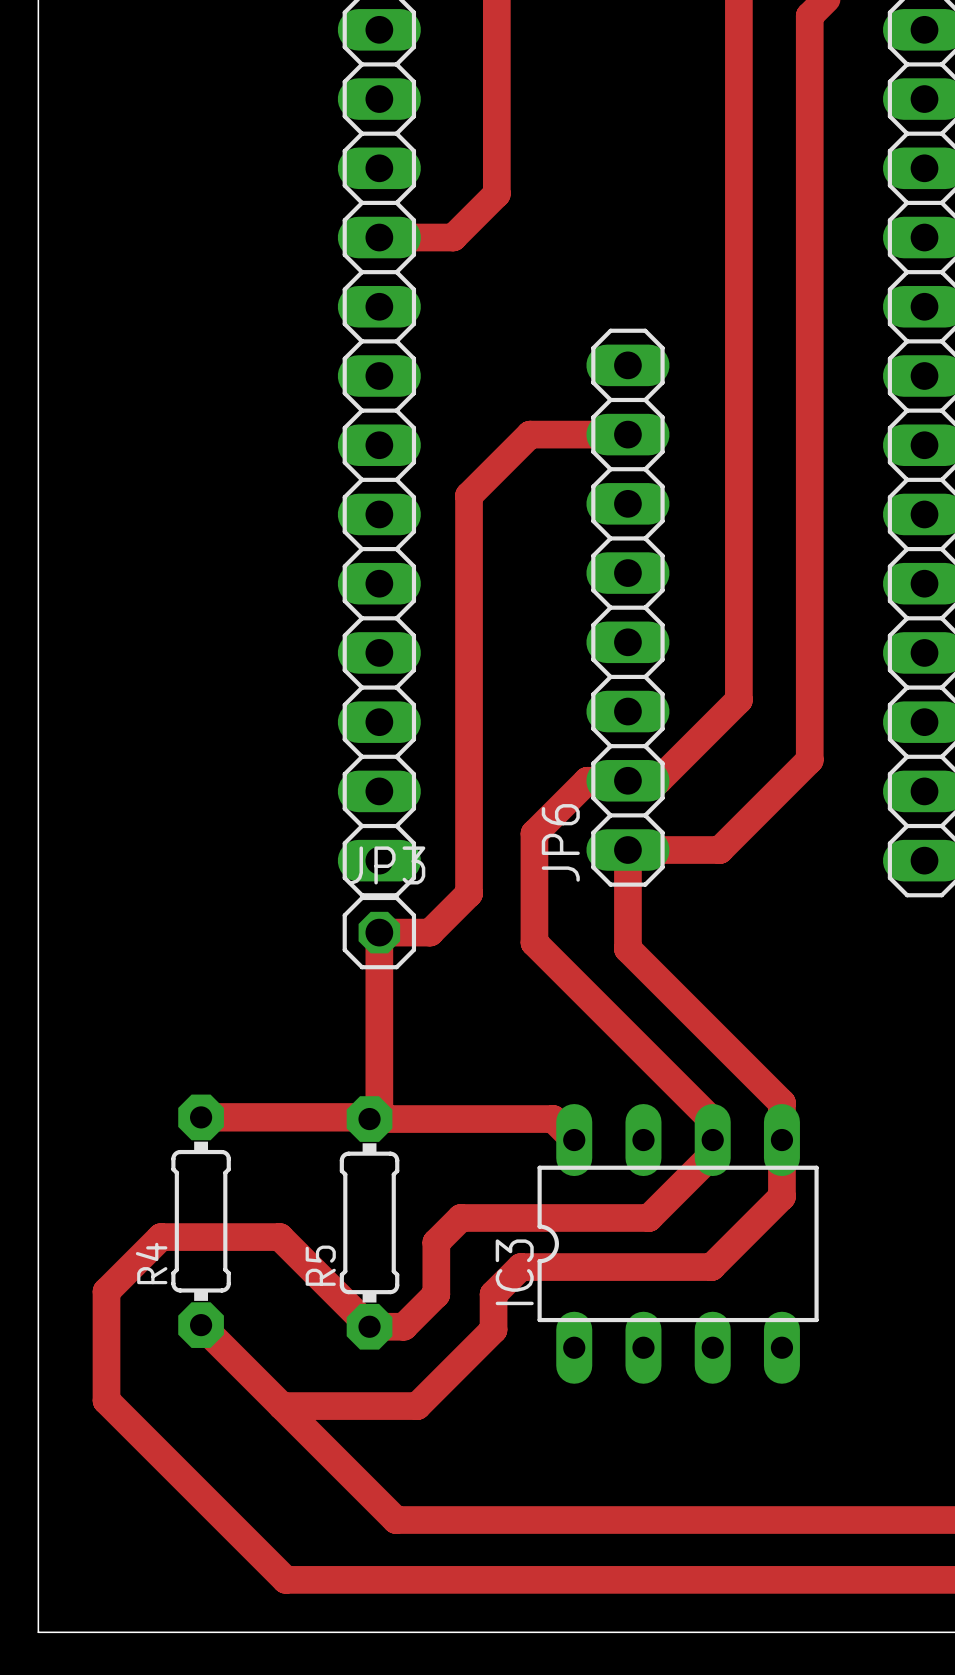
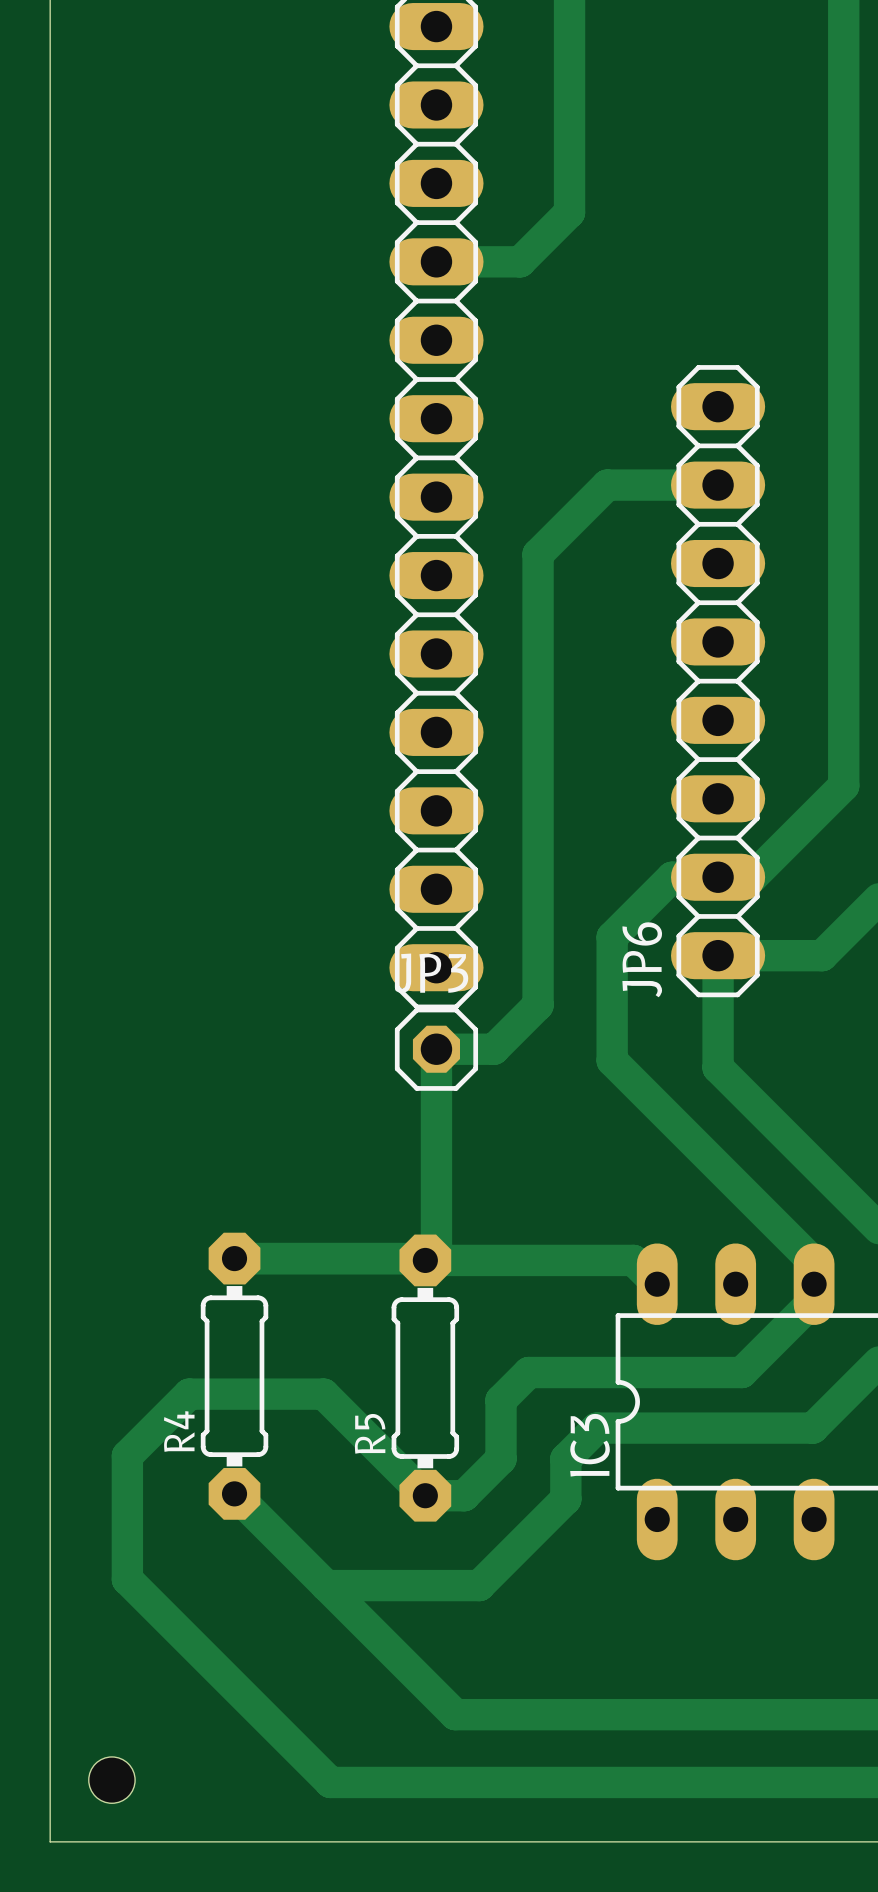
hole: none -> (111, 1780)

